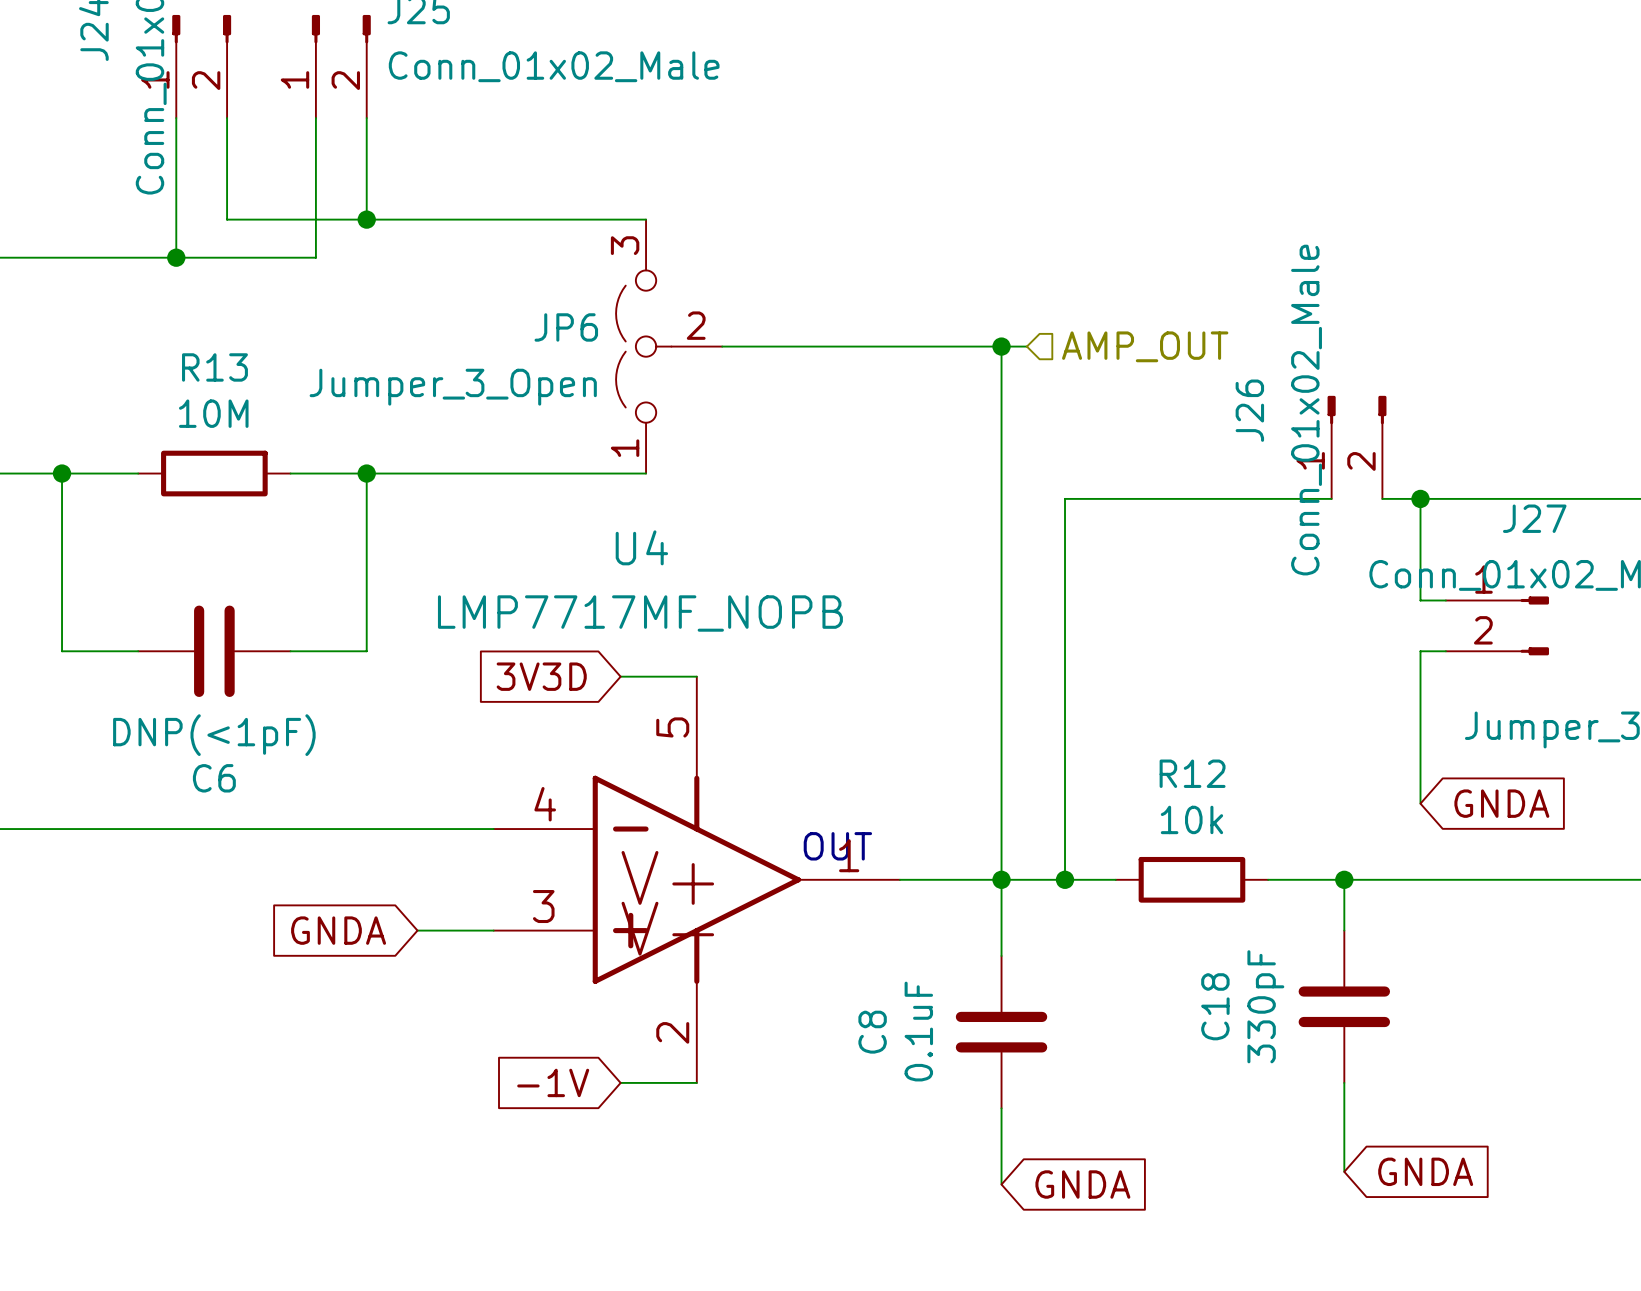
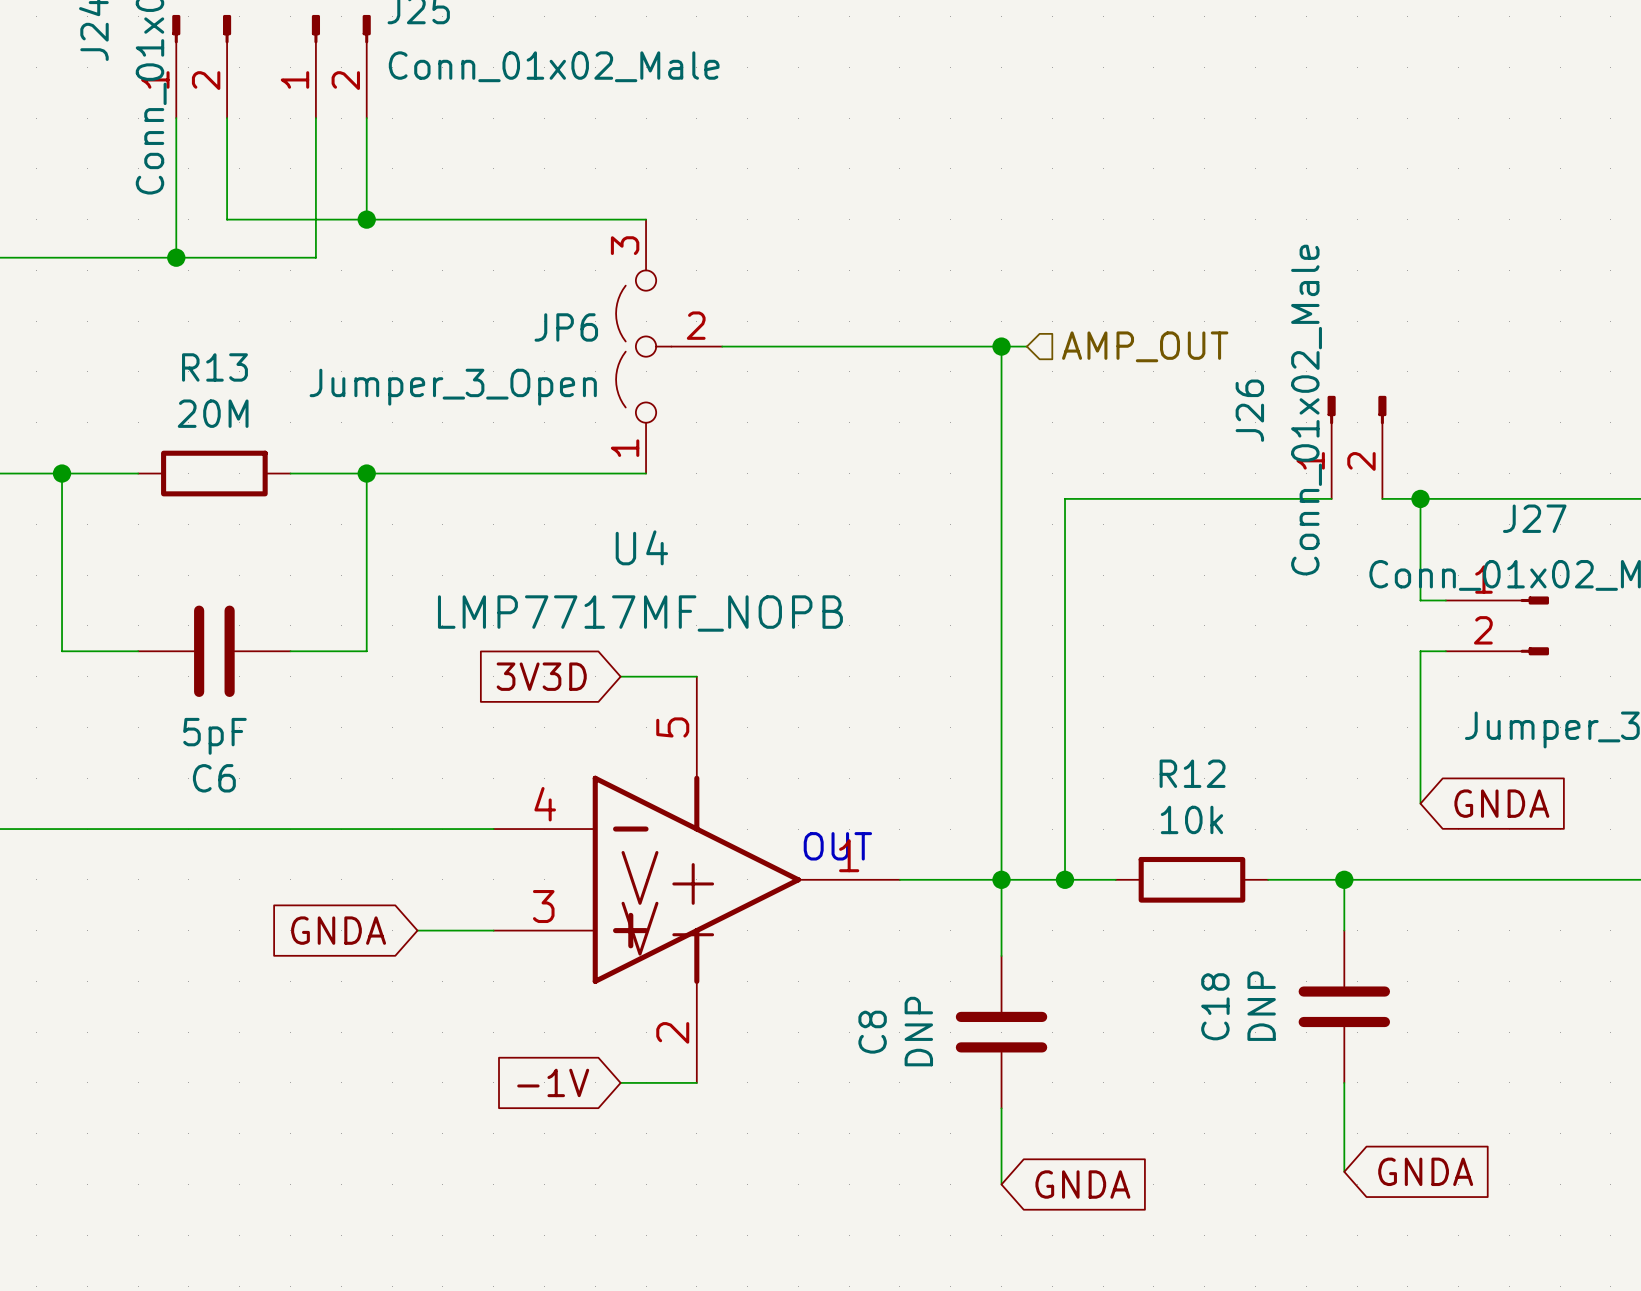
R13 value: 10M (213, 413) -> 20M (213, 413)
C6 value: DNP(<1pF) (214, 735) -> 5pF (214, 736)
C18 value: 330pF (1265, 1006) -> DNP (1261, 1006)
C8 value: 0.1uF (918, 1031) -> DNP (918, 1031)

